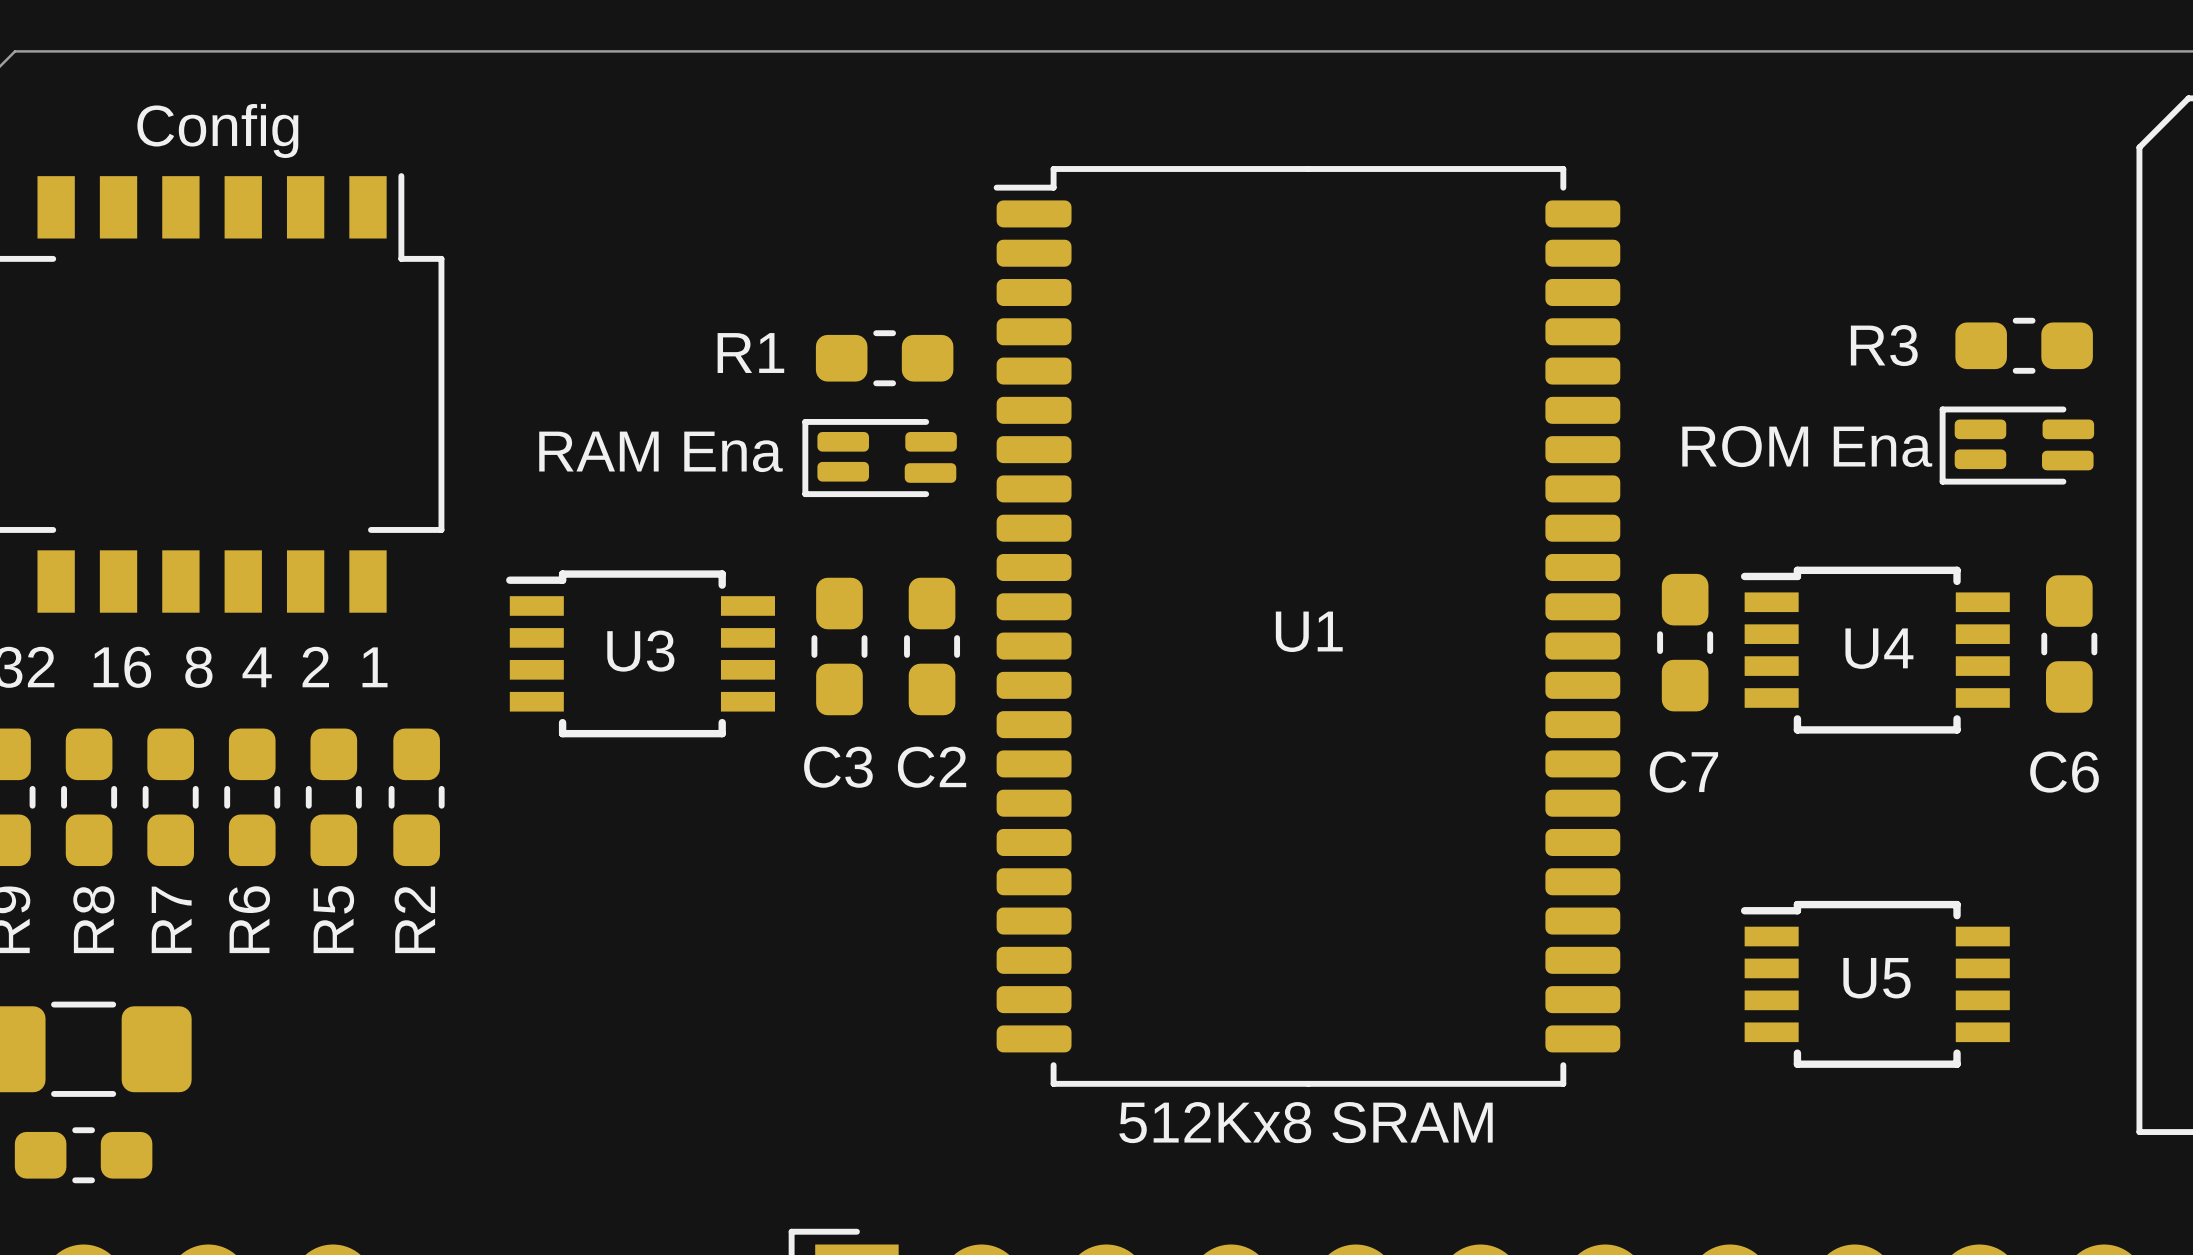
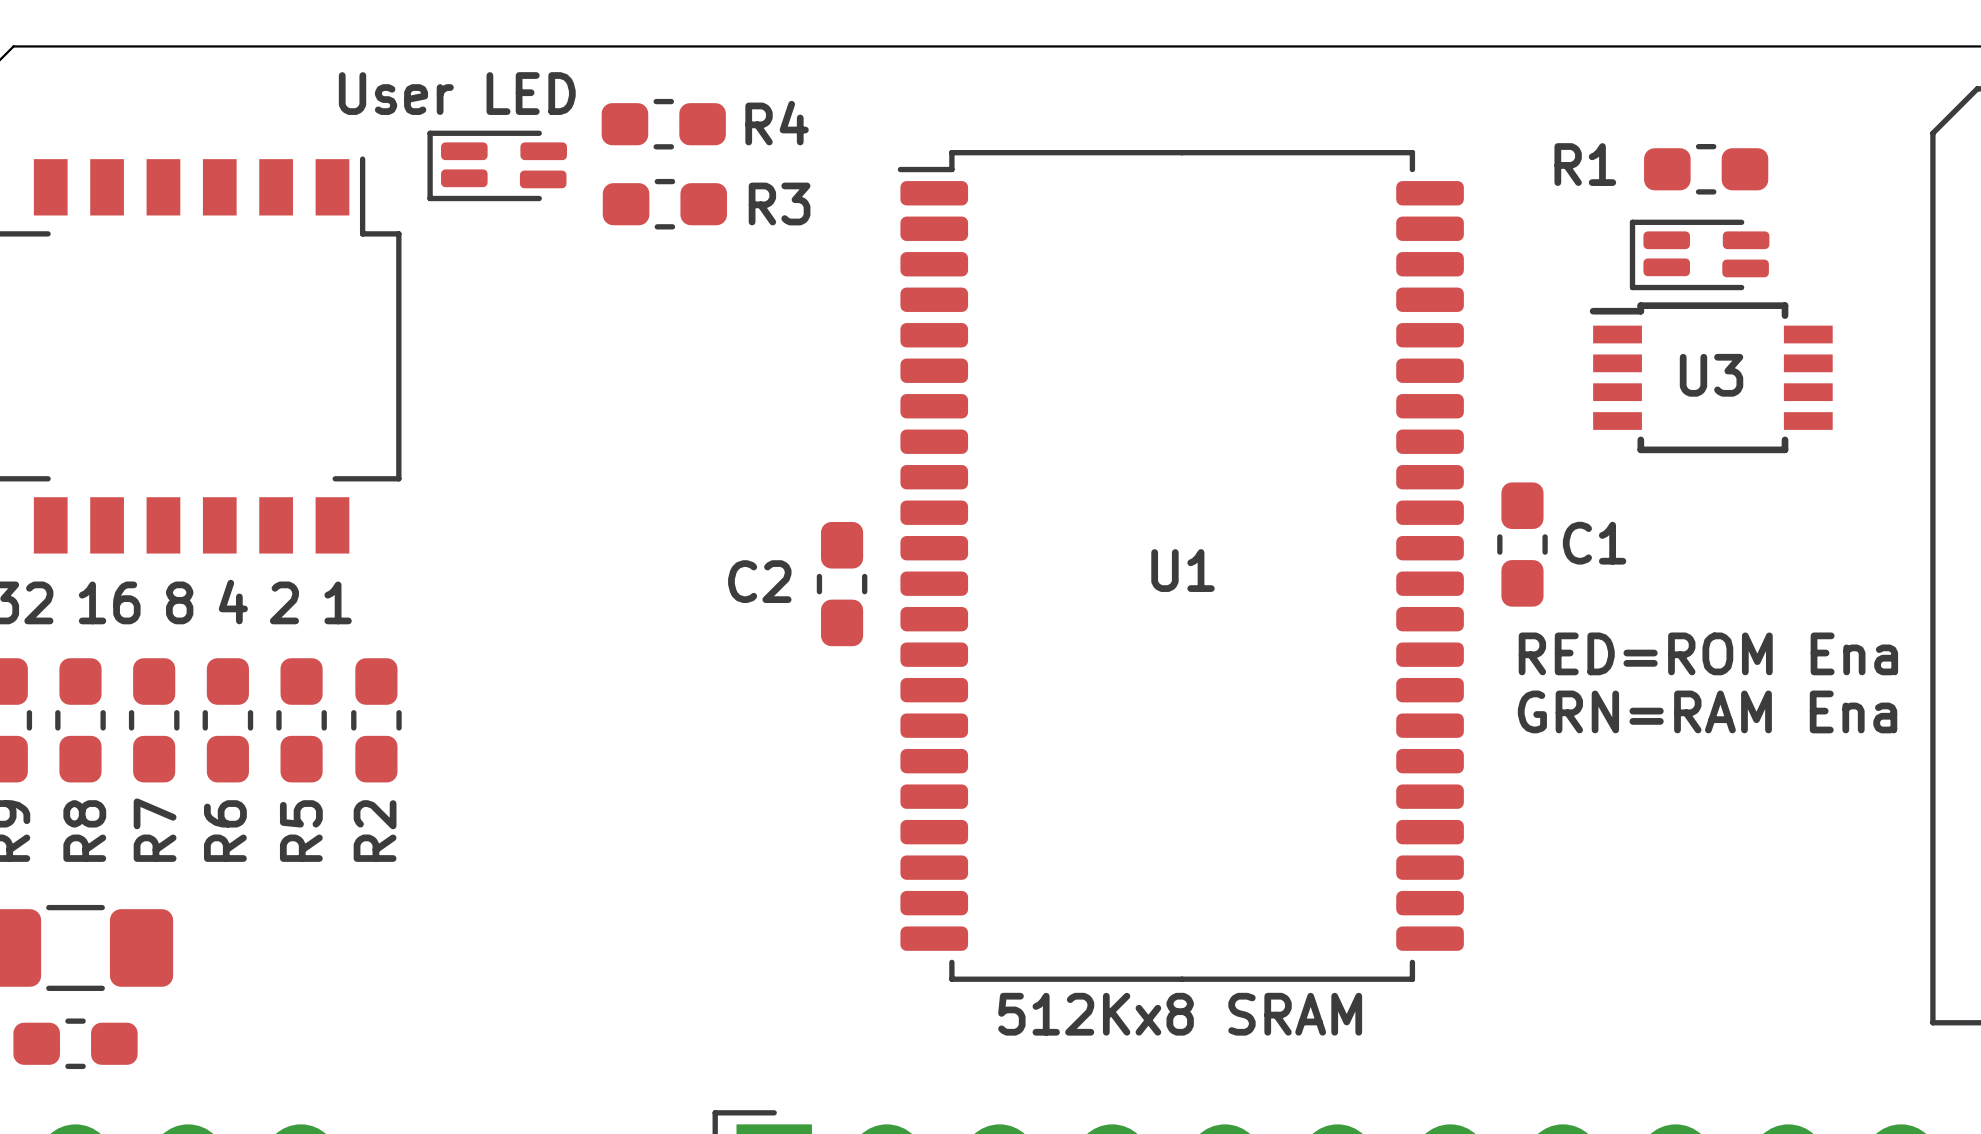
text: none -> User LED (457, 93)
text: Config (217, 130) -> none
R4: none -> (663, 124)
R3 name position: R3 (1884, 345) -> R3 (779, 203)
R3 position: (2024, 345) -> (664, 204)
R1 position: (884, 358) -> (1706, 169)
part position: (2016, 445) -> (1699, 254)
text: ROM Ena (1807, 446) -> none
text: RAM Ena (660, 451) -> none
part position: (879, 458) -> (497, 165)
C7 position: (1685, 642) -> (1522, 544)
C6: (2069, 644) -> none
C3: (839, 646) -> none
U4: (1875, 650) -> none
U3 position: (640, 653) -> (1711, 377)
text: none -> RED=ROM Ena (1708, 653)
C2 name position: C2 (932, 767) -> C2 (759, 581)
C7 name: C7 (1683, 772) -> C1 (1594, 543)
text: none -> GRN=RAM Ena (1707, 711)
U5: (1875, 984) -> none

